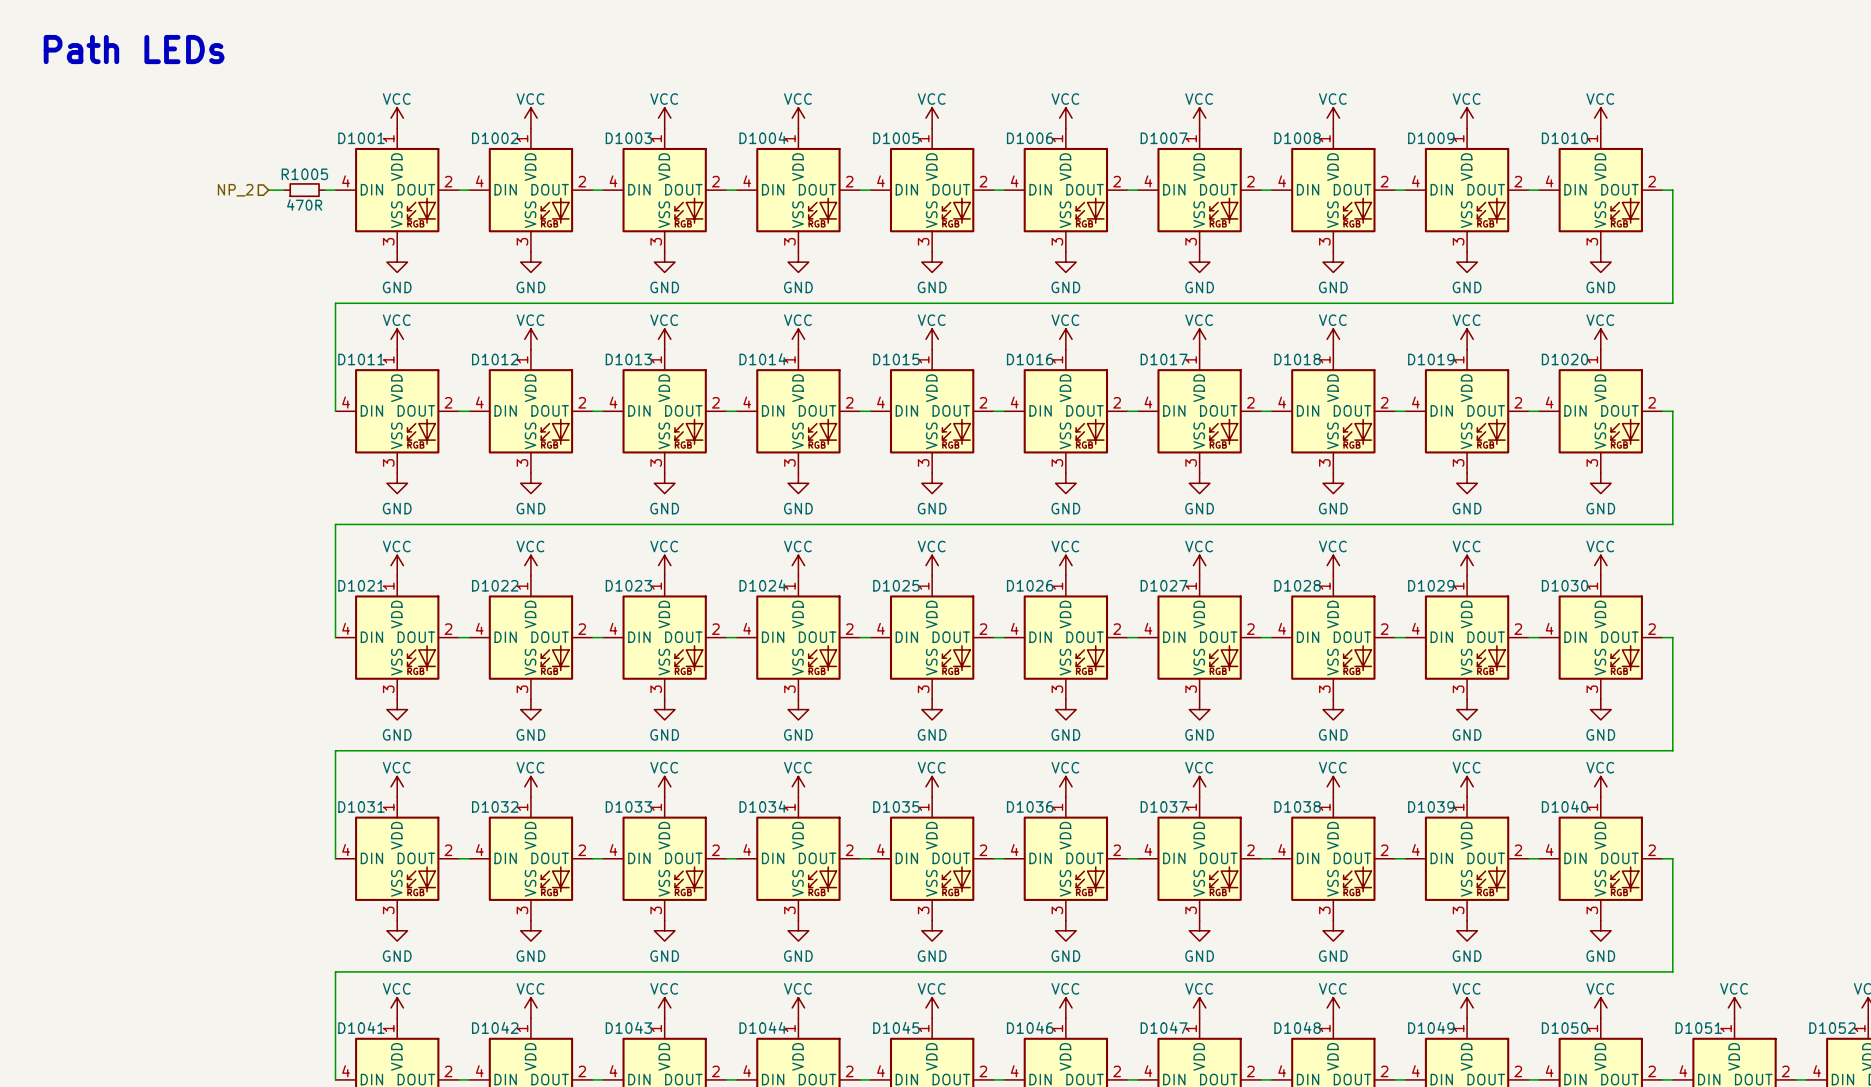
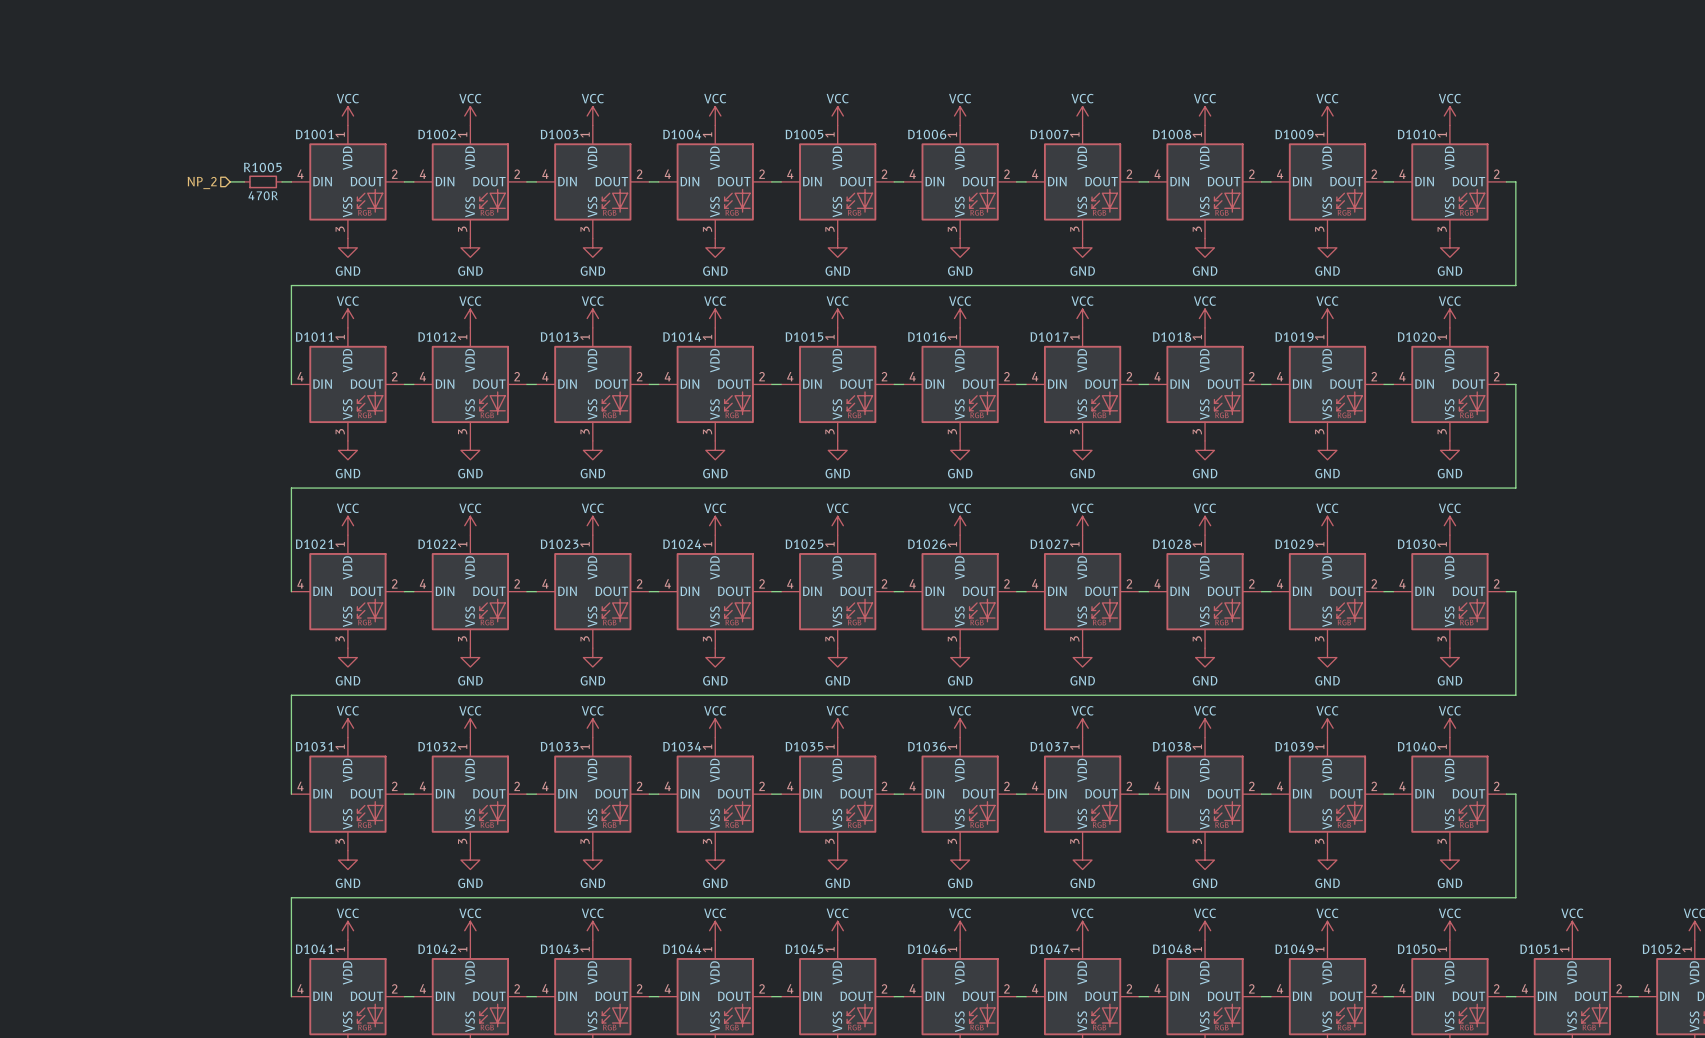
text: Path LEDs (134, 49) -> none

